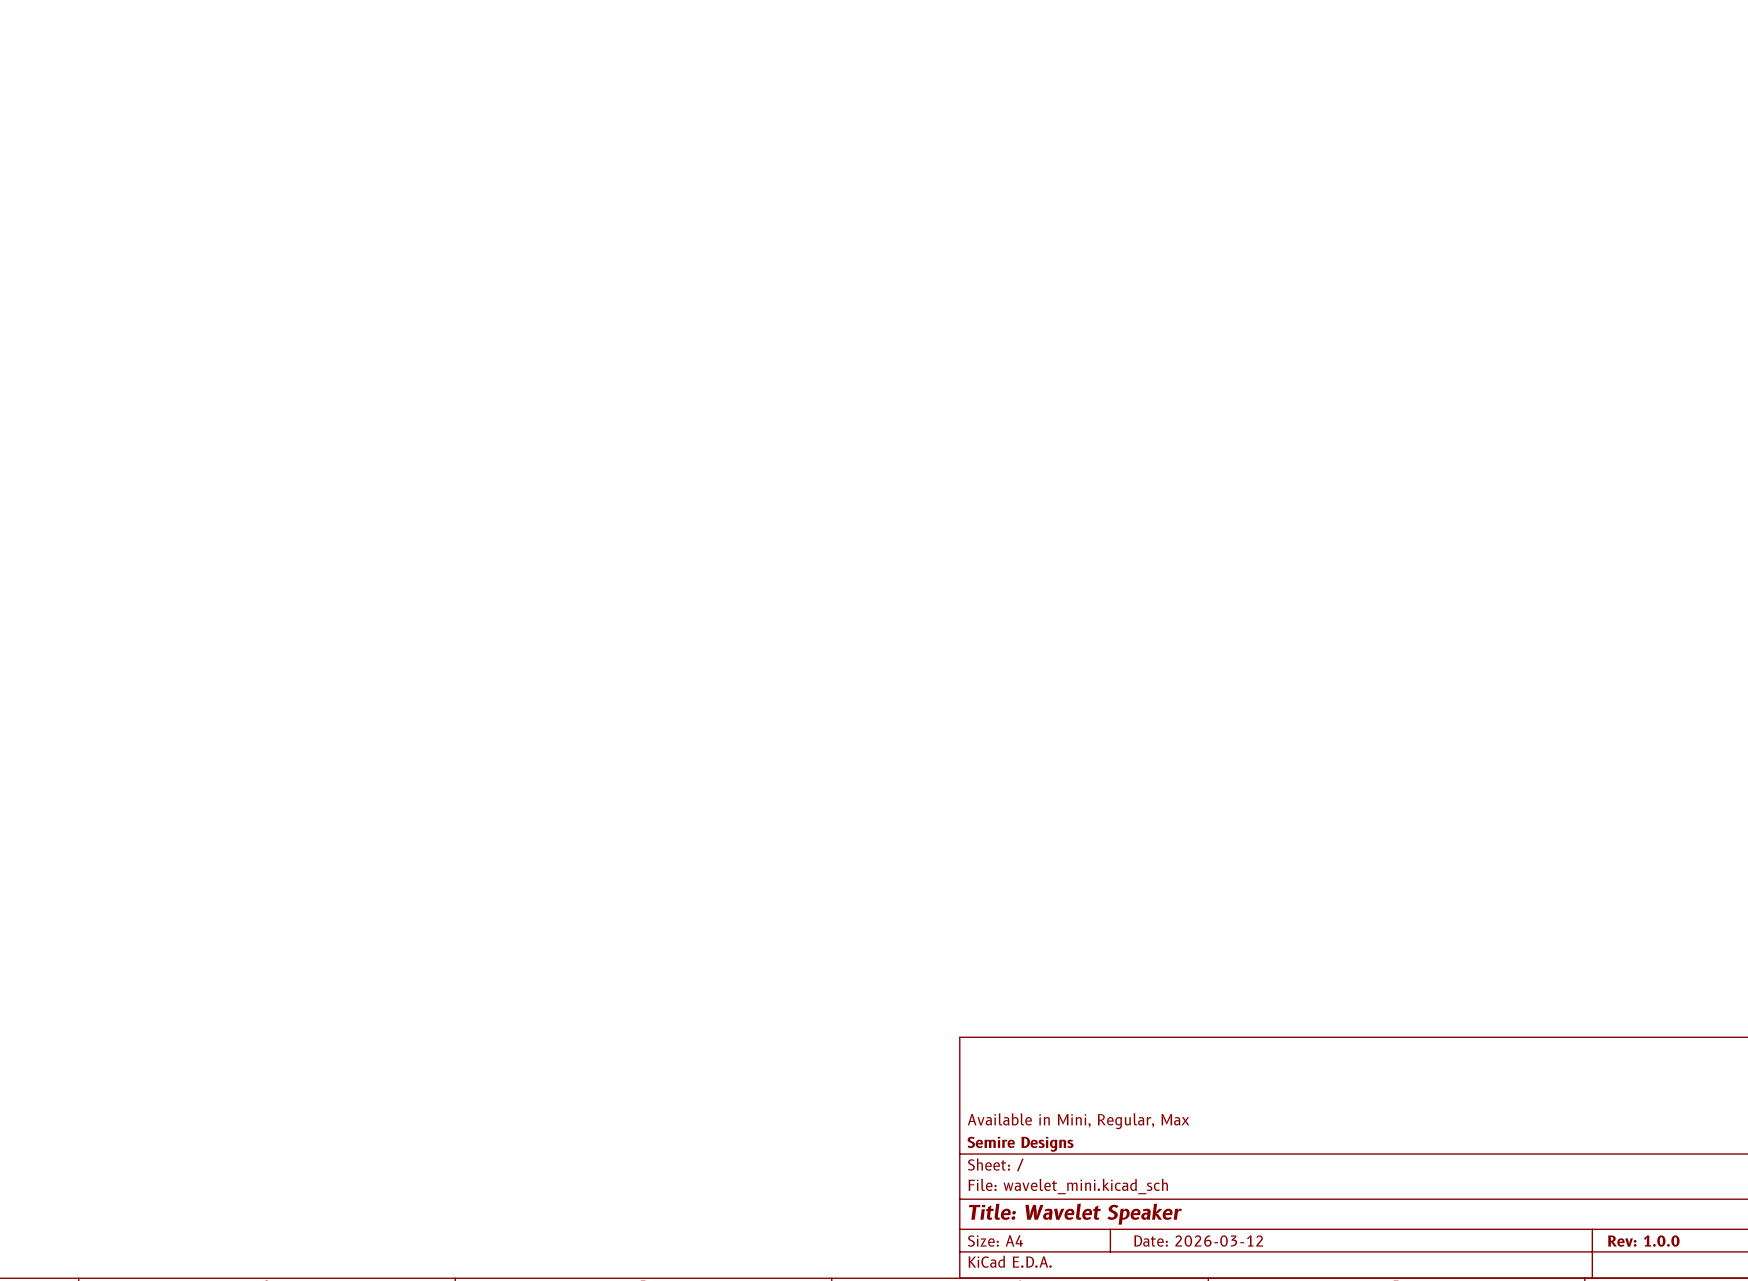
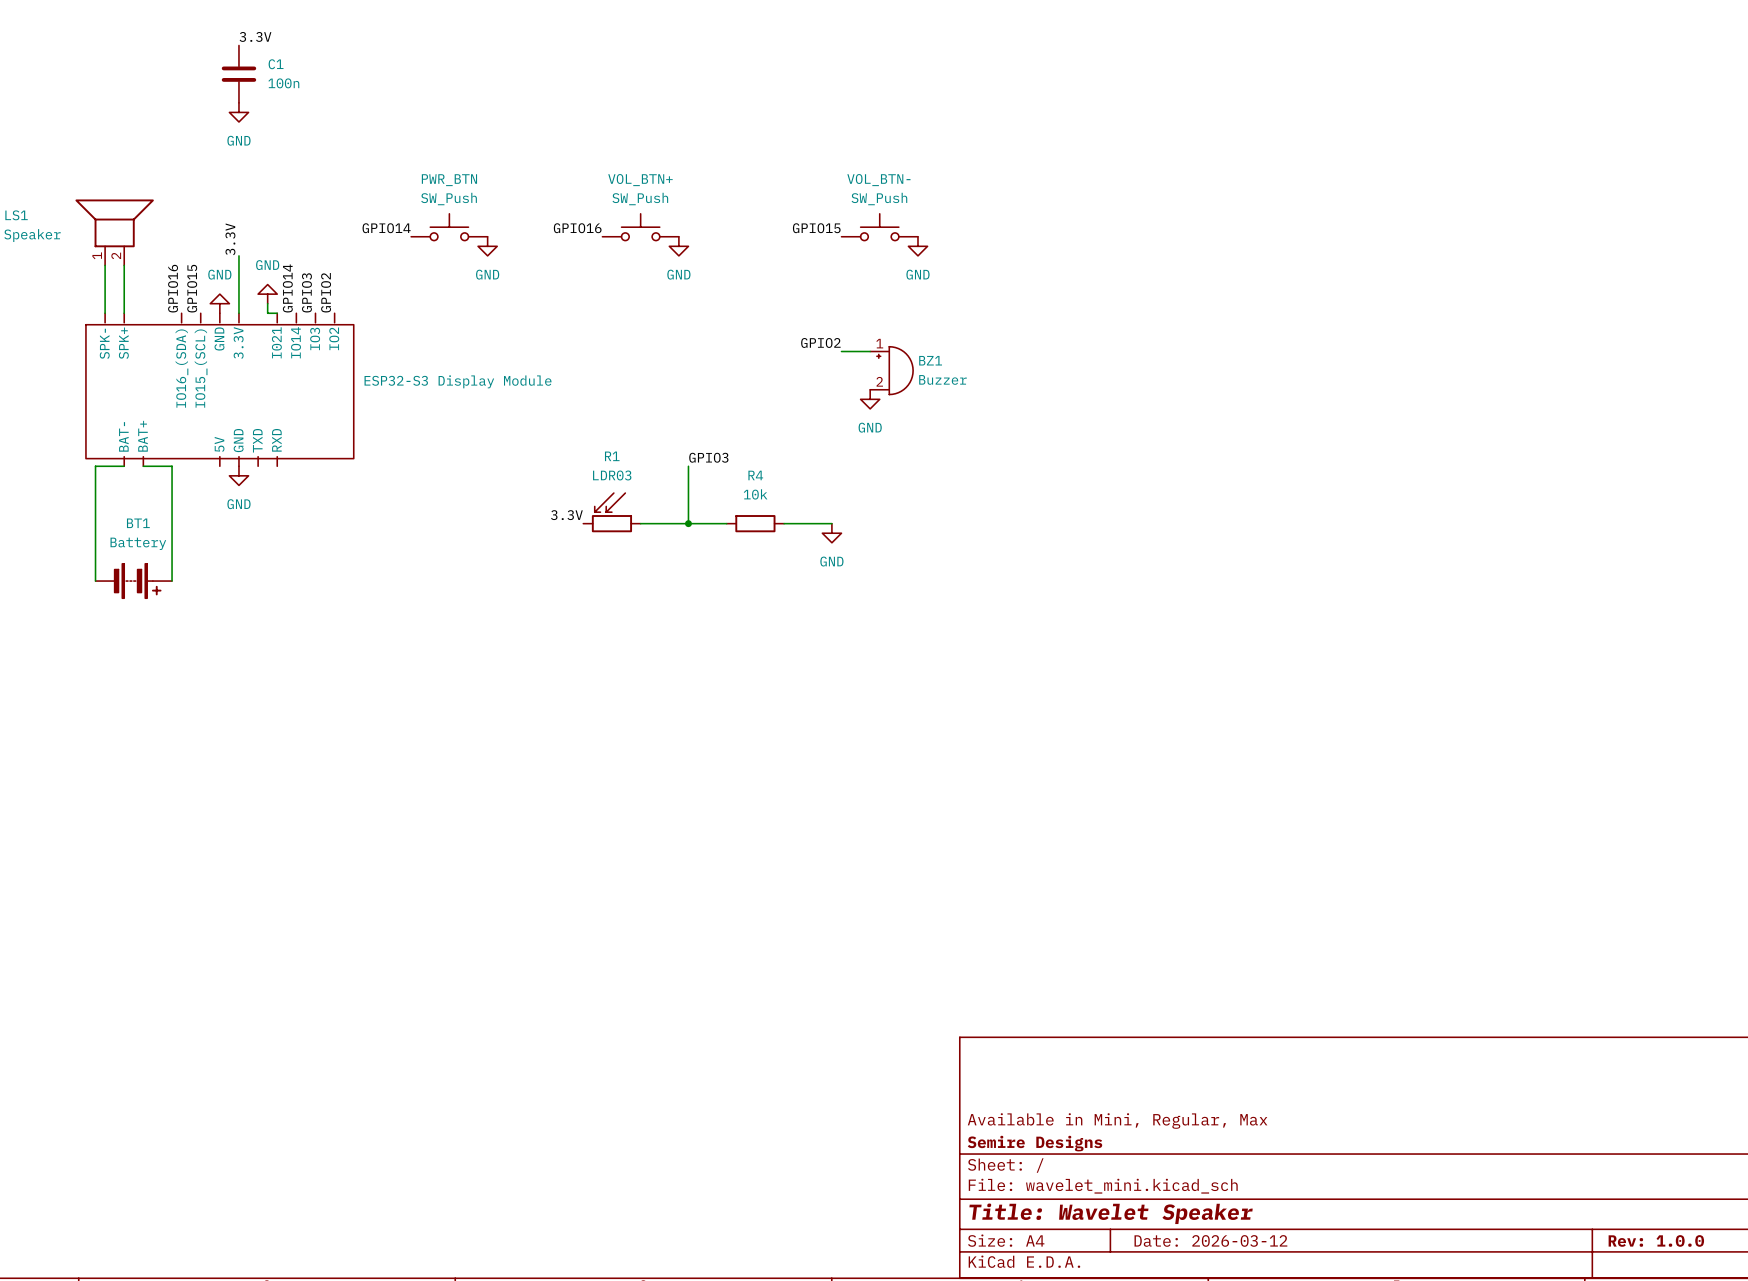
label: none -> 3.3V (255, 36)
C1: none -> 100n (238, 74)
power symbol: none -> GND (238, 112)
PWR_BTN: none -> SW_Push (449, 227)
VOL_BTN+: none -> SW_Push (640, 227)
VOL_BTN-: none -> SW_Push (879, 227)
label: none -> GPIO14 (386, 228)
label: none -> GPIO16 (577, 228)
label: none -> GPIO15 (816, 228)
LS1: none -> Speaker (114, 232)
label: none -> 3.3V (230, 239)
power symbol: none -> GND (487, 246)
power symbol: none -> GND (678, 246)
power symbol: none -> GND (917, 246)
wire: none -> (238, 255) (238, 313)
wire: none -> (105, 265) (105, 313)
wire: none -> (124, 265) (124, 313)
label: none -> GPIO16 (173, 288)
label: none -> GPIO15 (192, 288)
label: none -> GPIO14 (287, 288)
power symbol: none -> GND (267, 294)
label: none -> GPIO3 (306, 292)
label: none -> GPIO2 (326, 292)
power symbol: none -> GND (219, 303)
wire: none -> (267, 303) (267, 313) (277, 313)
label: none -> GPIO2 (820, 342)
wire: none -> (841, 351) (870, 351)
BZ1: none -> Buzzer (891, 370)
ESP32-S3 Display Module: none -> (219, 389)
power symbol: none -> GND (870, 399)
label: none -> GPIO3 (708, 457)
wire: none -> (124, 466) (95, 466) (95, 581)
wire: none -> (143, 466) (172, 466) (172, 581)
wire: none -> (688, 466) (688, 523)
power symbol: none -> GND (238, 475)
R1: none -> LDR03 (611, 512)
label: none -> 3.3V (566, 515)
wire: none -> (640, 523) (726, 523)
junction: none -> (688, 523)
R4: none -> 10k (755, 523)
wire: none -> (784, 523) (831, 523)
power symbol: none -> GND (831, 533)
BT1: none -> Battery (133, 581)

